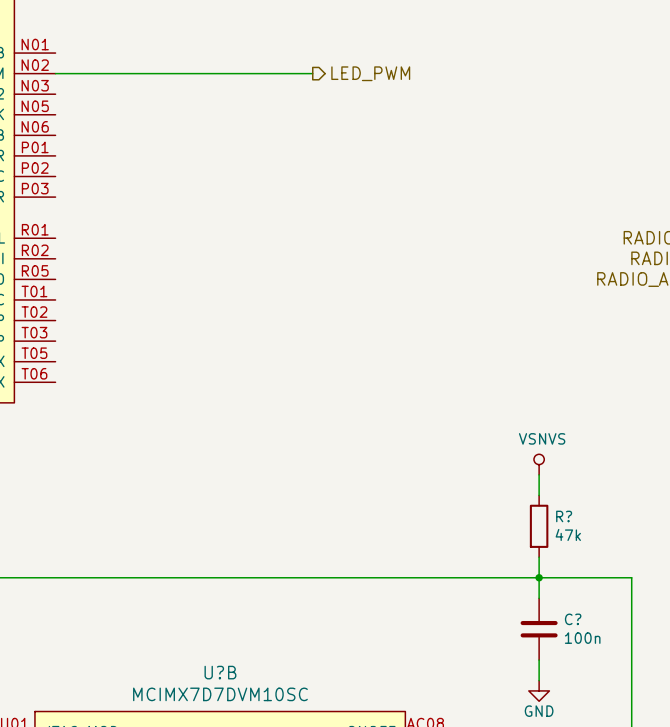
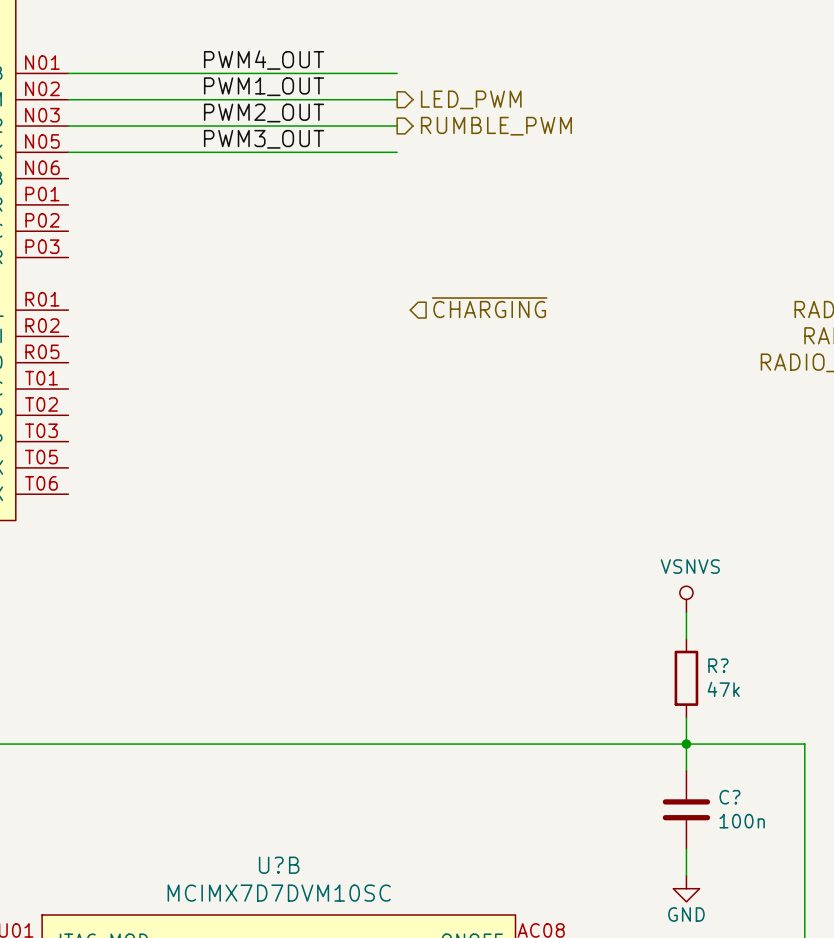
label: none -> PWM4_OUT (264, 60)
wire: none -> (68, 73) (397, 73)
label: none -> PWM1_OUT (264, 86)
label: none -> PWM2_OUT (264, 113)
wire: none -> (68, 126) (397, 126)
hierarchical label: none -> RUMBLE_PWM (496, 126)
label: none -> PWM3_OUT (264, 139)
wire: none -> (68, 152) (397, 152)
hierarchical label: none -> ~{CHARGING} (489, 307)

